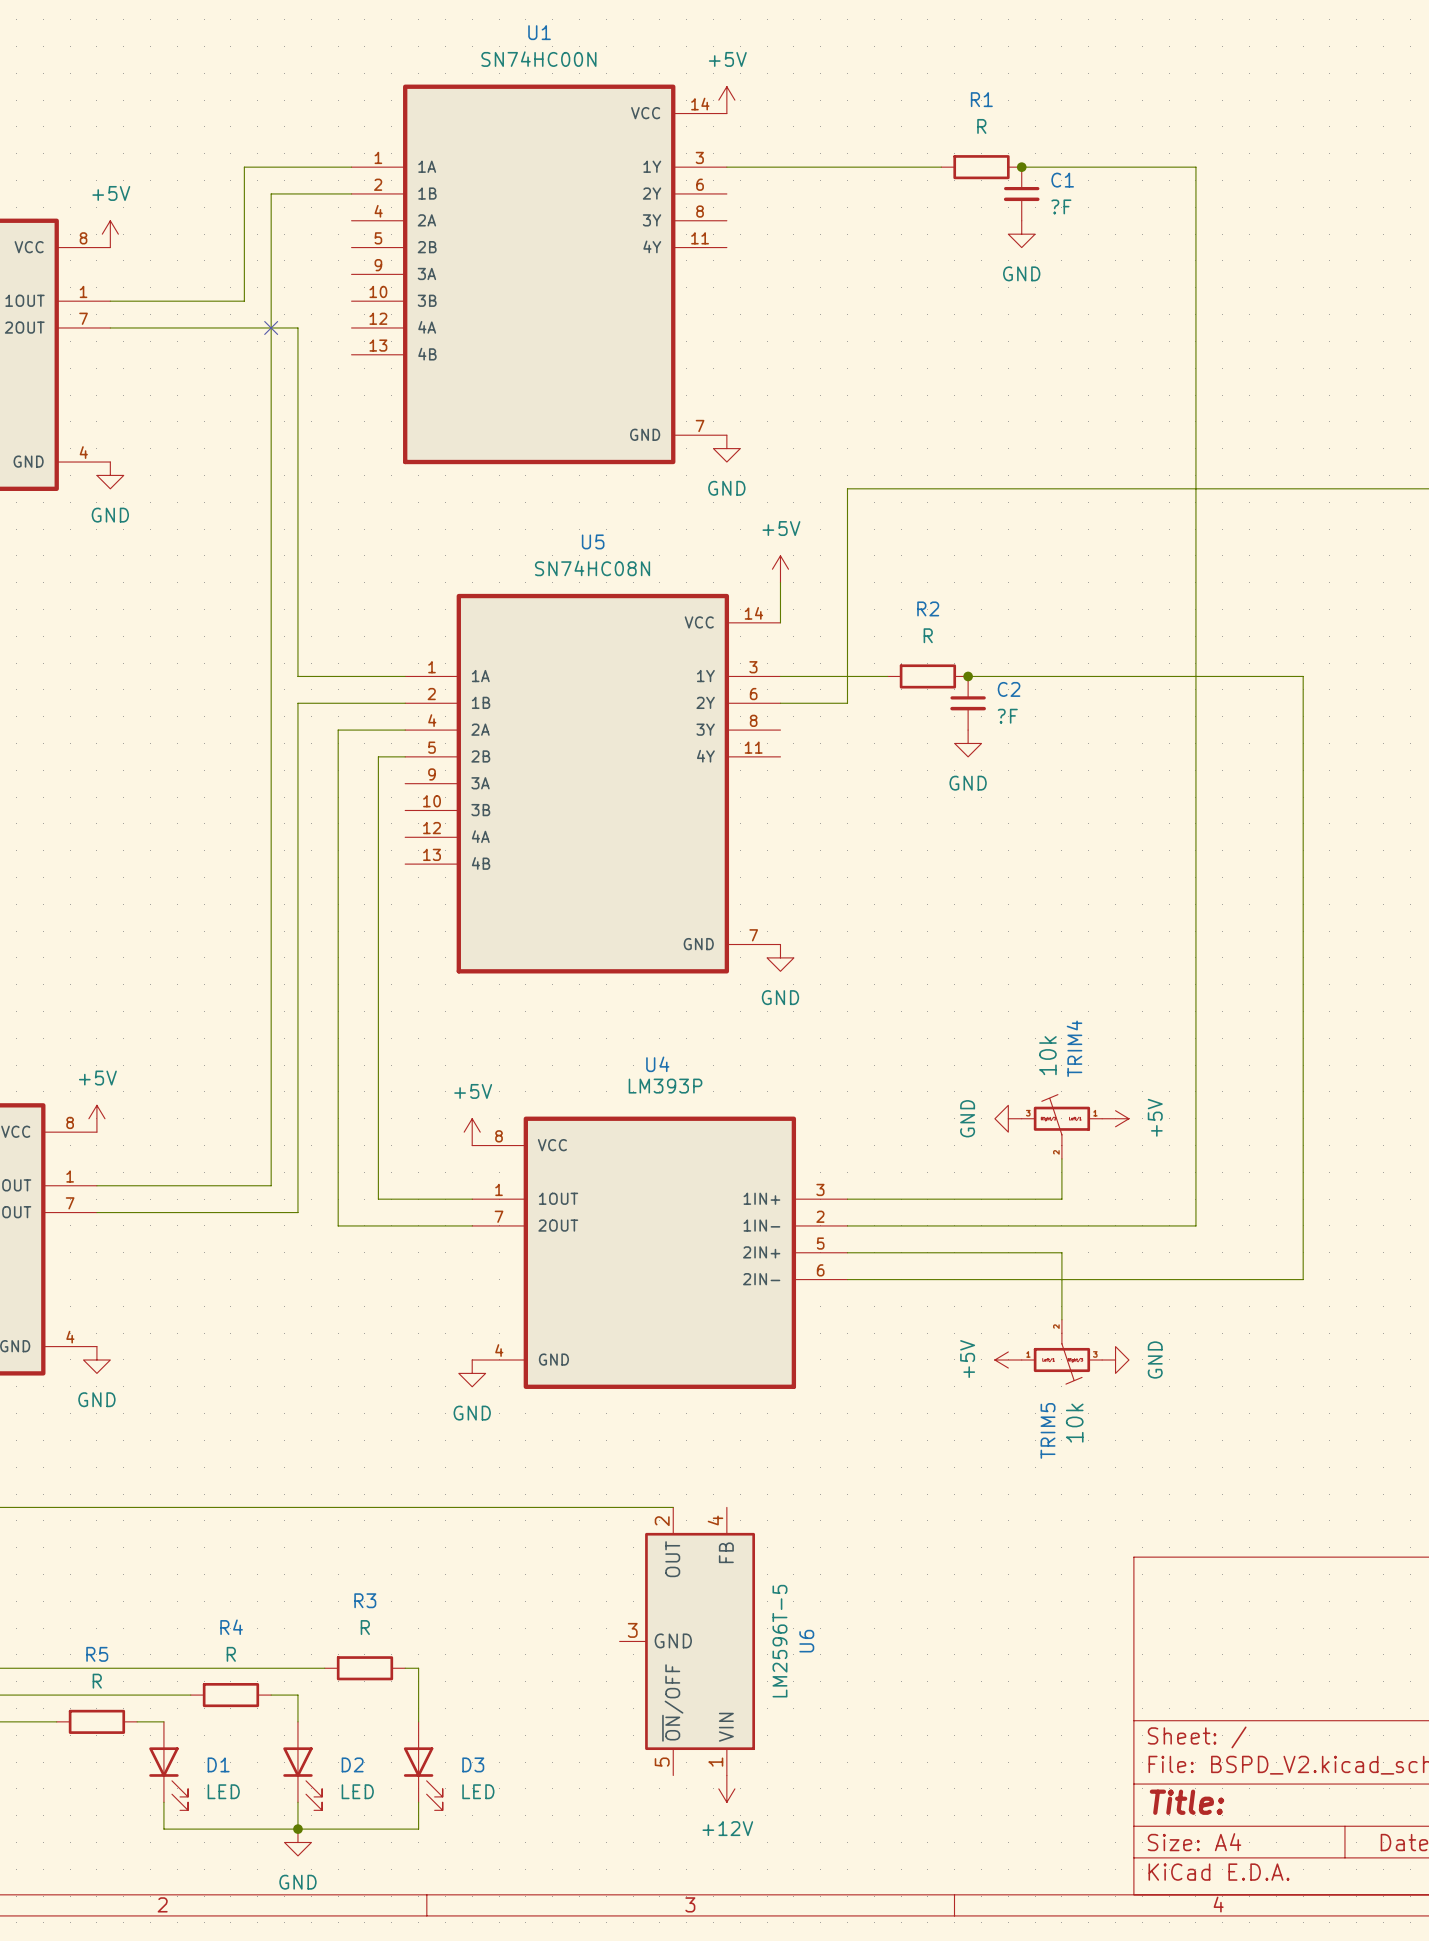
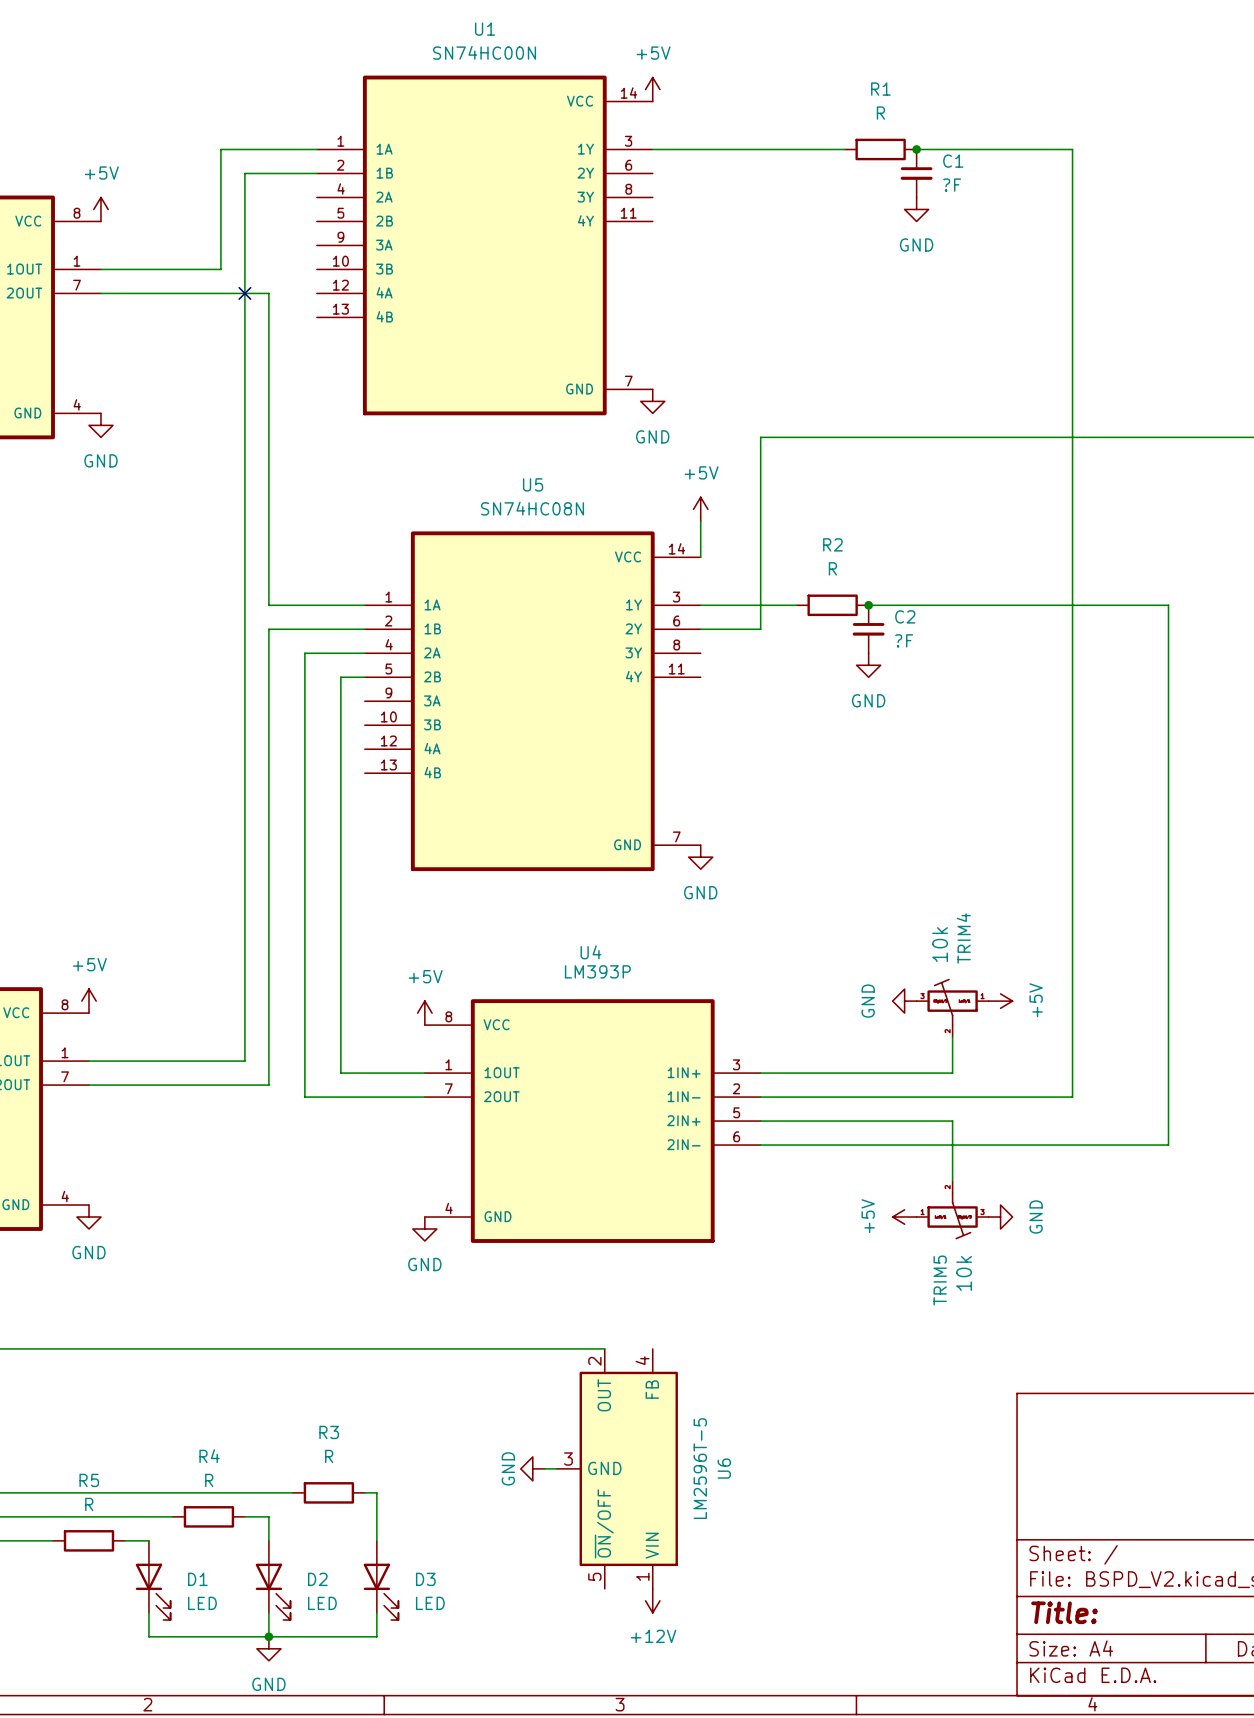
power symbol: none -> GND (532, 1468)
wire: none -> (544, 1468) (556, 1468)

